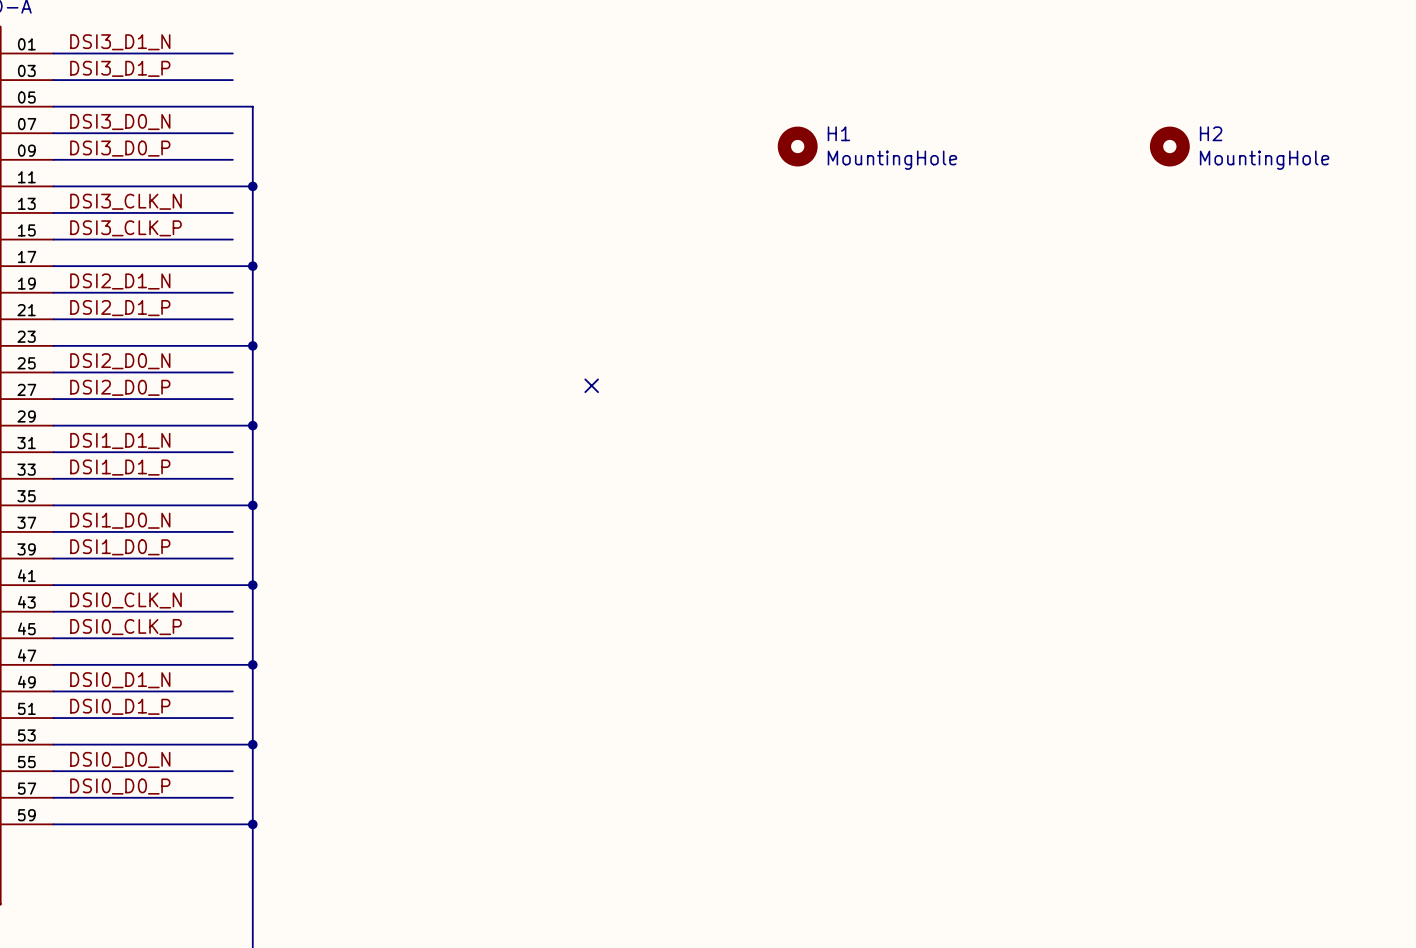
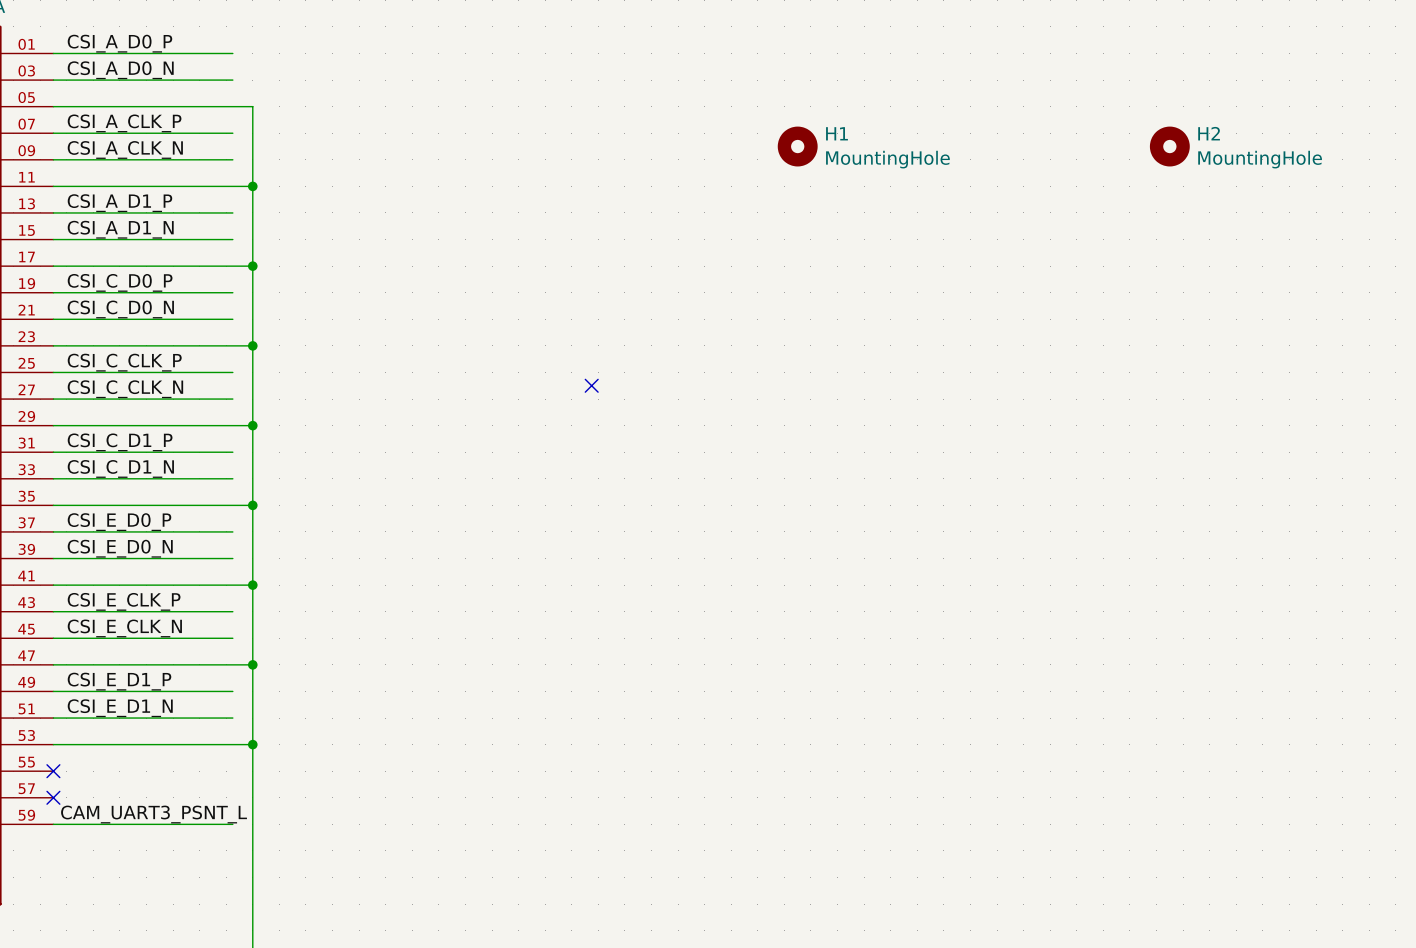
label: DSI3_D1_N (120, 42) -> CSI_A_D0_P (119, 43)
label: DSI3_D1_P (120, 68) -> CSI_A_D0_N (120, 70)
label: DSI3_D0_N (120, 122) -> CSI_A_CLK_P (124, 123)
label: DSI3_D0_P (120, 148) -> CSI_A_CLK_N (125, 149)
label: DSI3_CLK_N (125, 201) -> CSI_A_D1_P (119, 203)
label: DSI3_CLK_P (125, 228) -> CSI_A_D1_N (120, 229)
label: DSI2_D1_N (120, 281) -> CSI_C_D0_P (120, 282)
label: DSI2_D1_P (120, 308) -> CSI_C_D0_N (120, 309)
label: DSI2_D0_N (120, 361) -> CSI_C_CLK_P (124, 362)
label: DSI2_D0_P (120, 387) -> CSI_C_CLK_N (125, 389)
label: DSI1_D1_N (120, 440) -> CSI_C_D1_P (120, 442)
label: DSI1_D1_P (120, 467) -> CSI_C_D1_N (120, 468)
label: DSI1_D0_N (120, 520) -> CSI_E_D0_P (119, 522)
label: DSI1_D0_P (120, 547) -> CSI_E_D0_N (120, 548)
label: DSI0_CLK_N (125, 600) -> CSI_E_CLK_P (124, 601)
label: DSI0_CLK_P (125, 627) -> CSI_E_CLK_N (124, 628)
label: DSI0_D1_N (120, 680) -> CSI_E_D1_P (119, 681)
label: DSI0_D1_P (120, 706) -> CSI_E_D1_N (120, 708)
label: DSI0_D0_N (120, 759) -> none
wire: (53, 771) (232, 771) -> none
no-connect mark: none -> (53, 771)
label: DSI0_D0_P (120, 786) -> none
wire: (53, 797) (232, 797) -> none
no-connect mark: none -> (53, 797)
label: none -> CAM_UART3_PSNT_L (154, 814)
wire: (232, 824) (252, 824) -> none
junction: (252, 824) -> none

